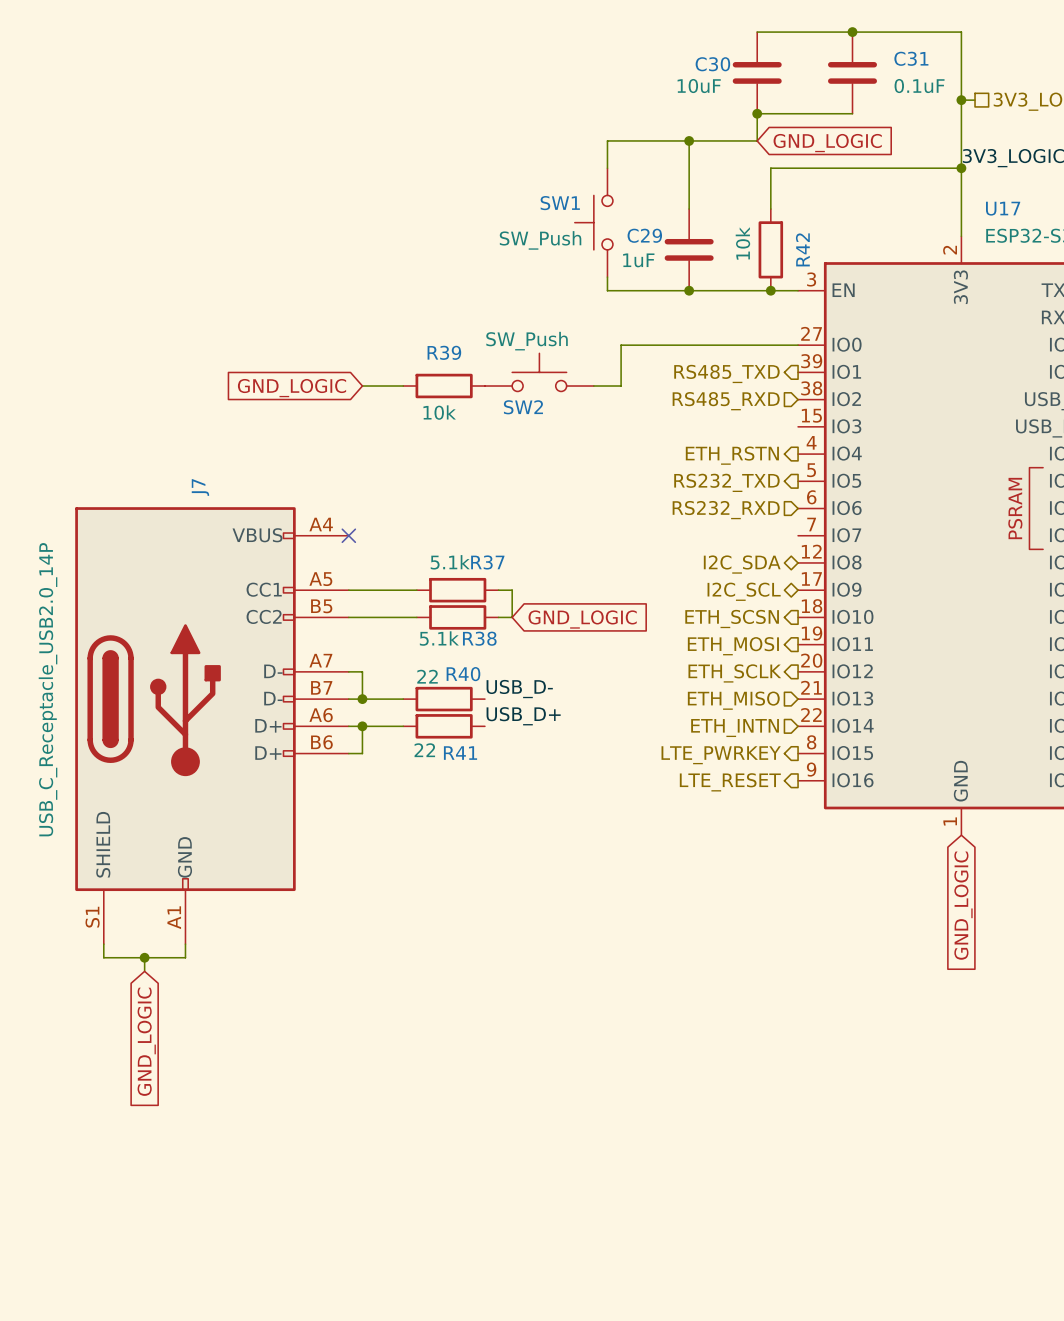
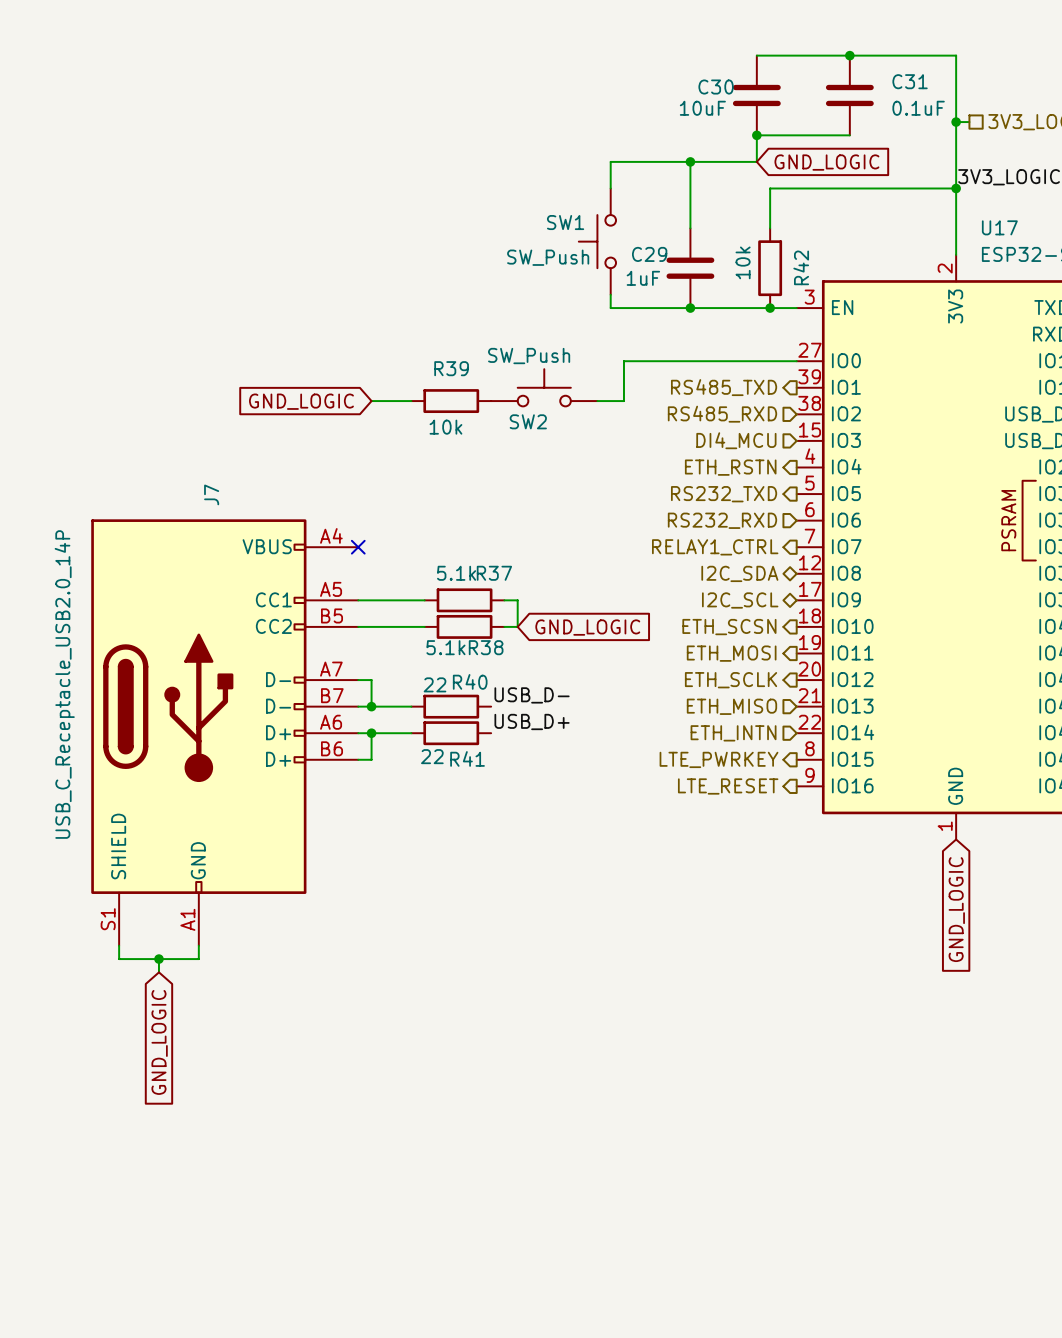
hierarchical label: none -> DI4_MCU (736, 440)
hierarchical label: none -> RELAY1_CTRL (715, 547)

